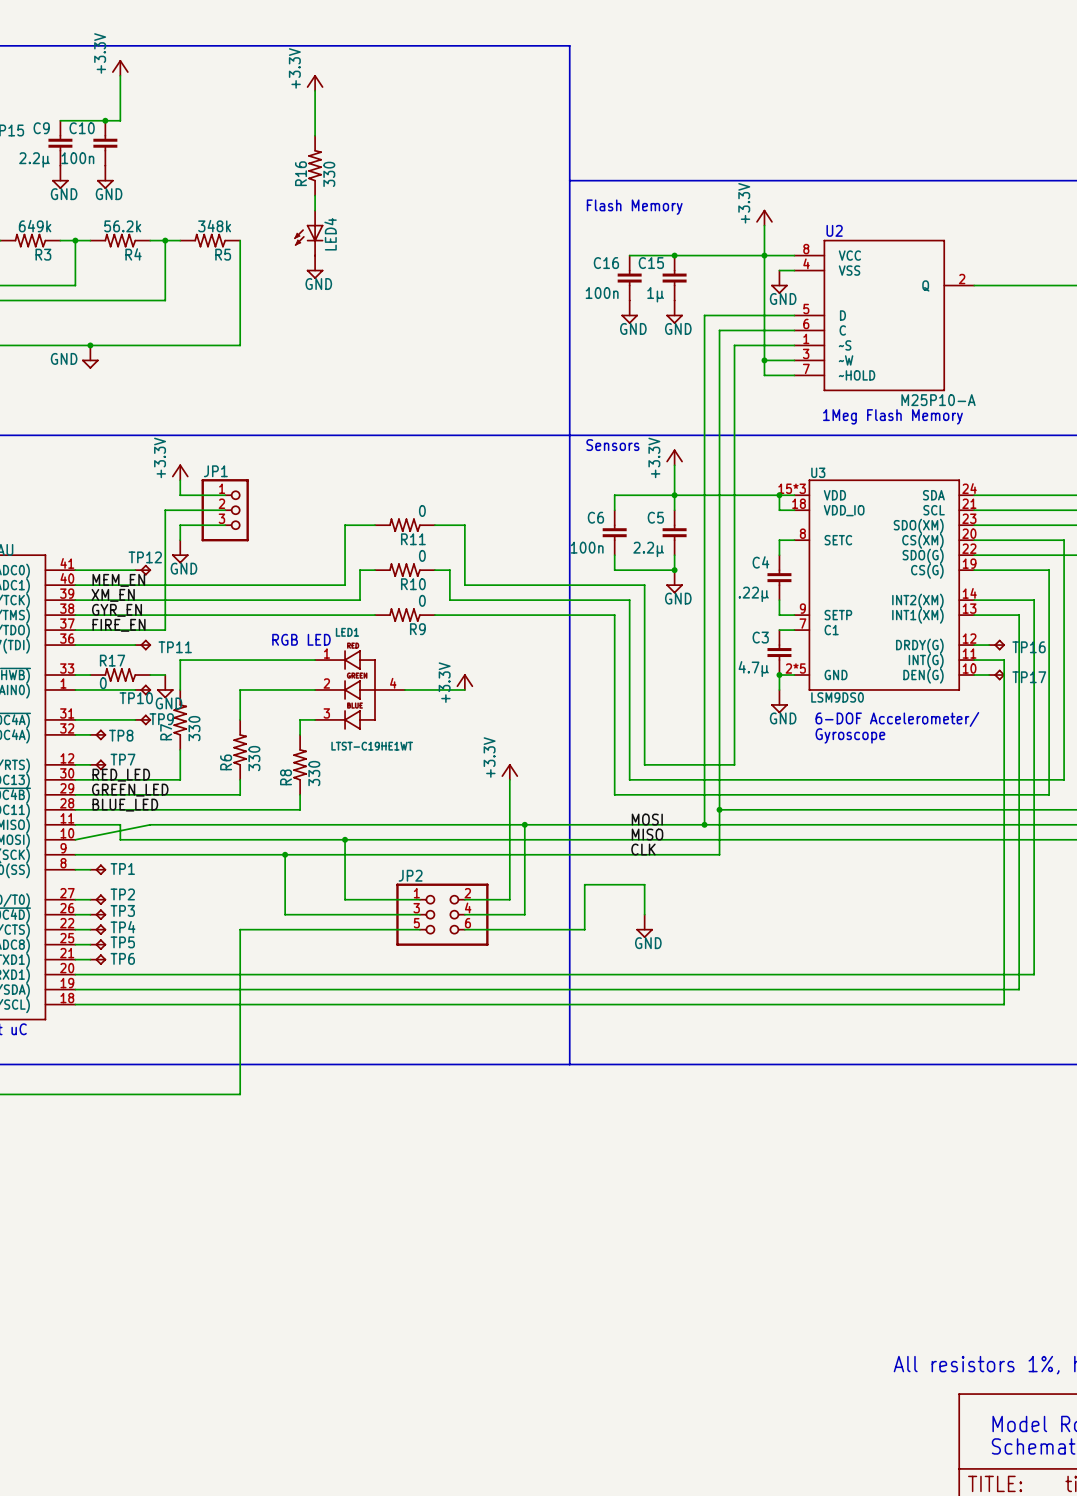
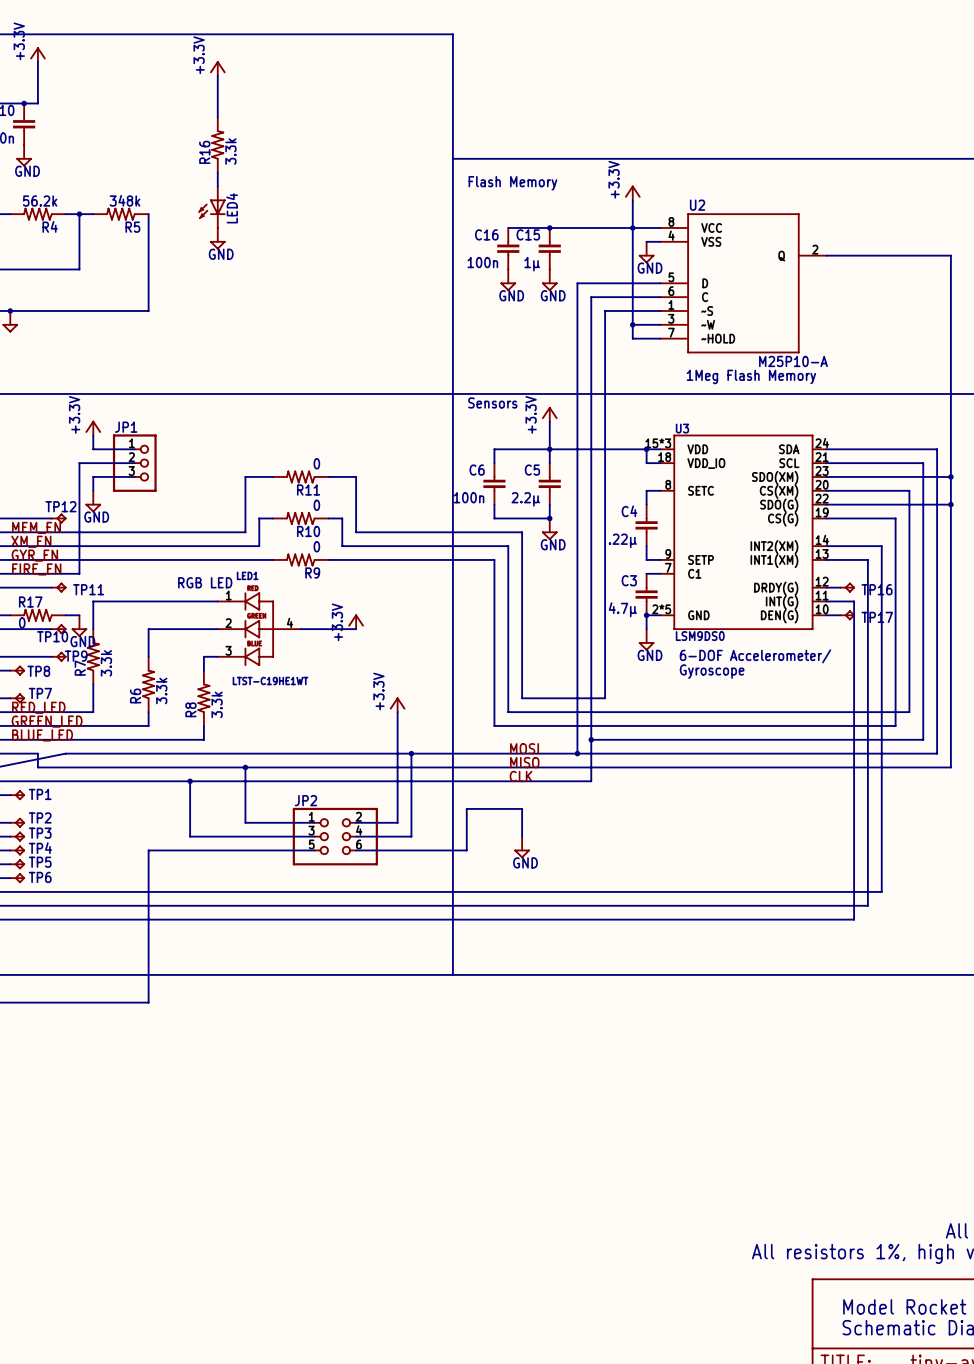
R16 value: 330 (329, 174) -> 3.3k (230, 151)
R7 value: 330 (194, 728) -> 3.3k (106, 663)
R6 value: 330 (254, 758) -> 3.3k (161, 691)
R8 value: 330 (314, 773) -> 3.3k (217, 704)

